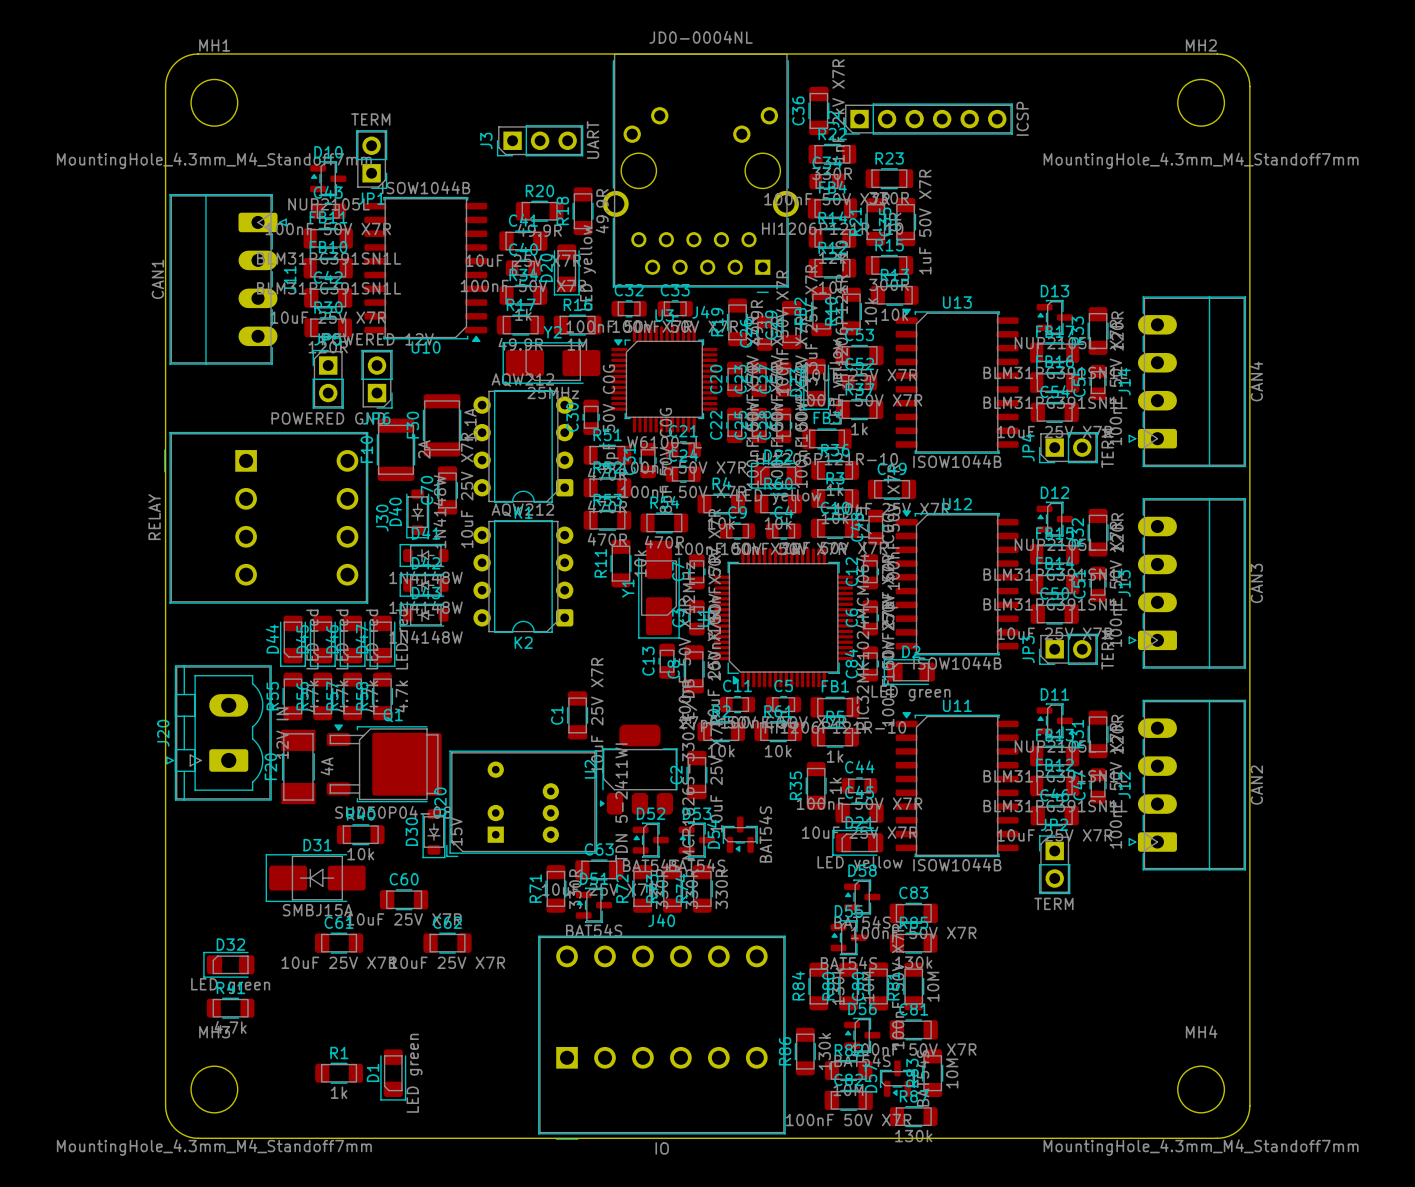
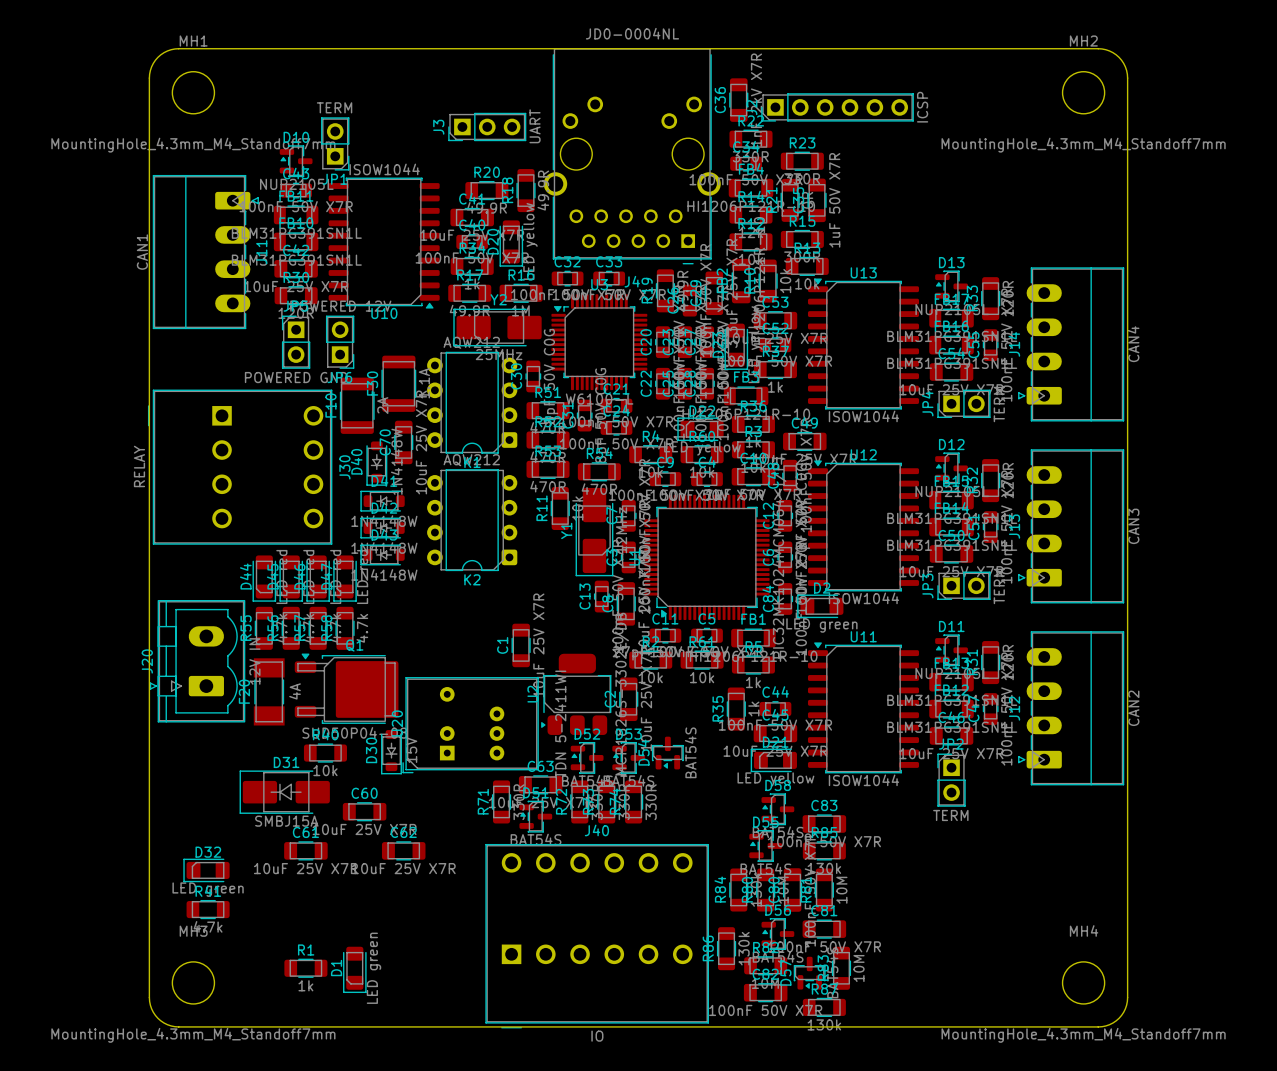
U10 value: ISOW1044B (426, 187) -> ISOW1044 (384, 169)
U13 value: ISOW1044B (957, 461) -> ISOW1044 (863, 416)
U12 value: ISOW1044B (957, 663) -> ISOW1044 (863, 598)
U11 value: ISOW1044B (957, 864) -> ISOW1044 (863, 780)

